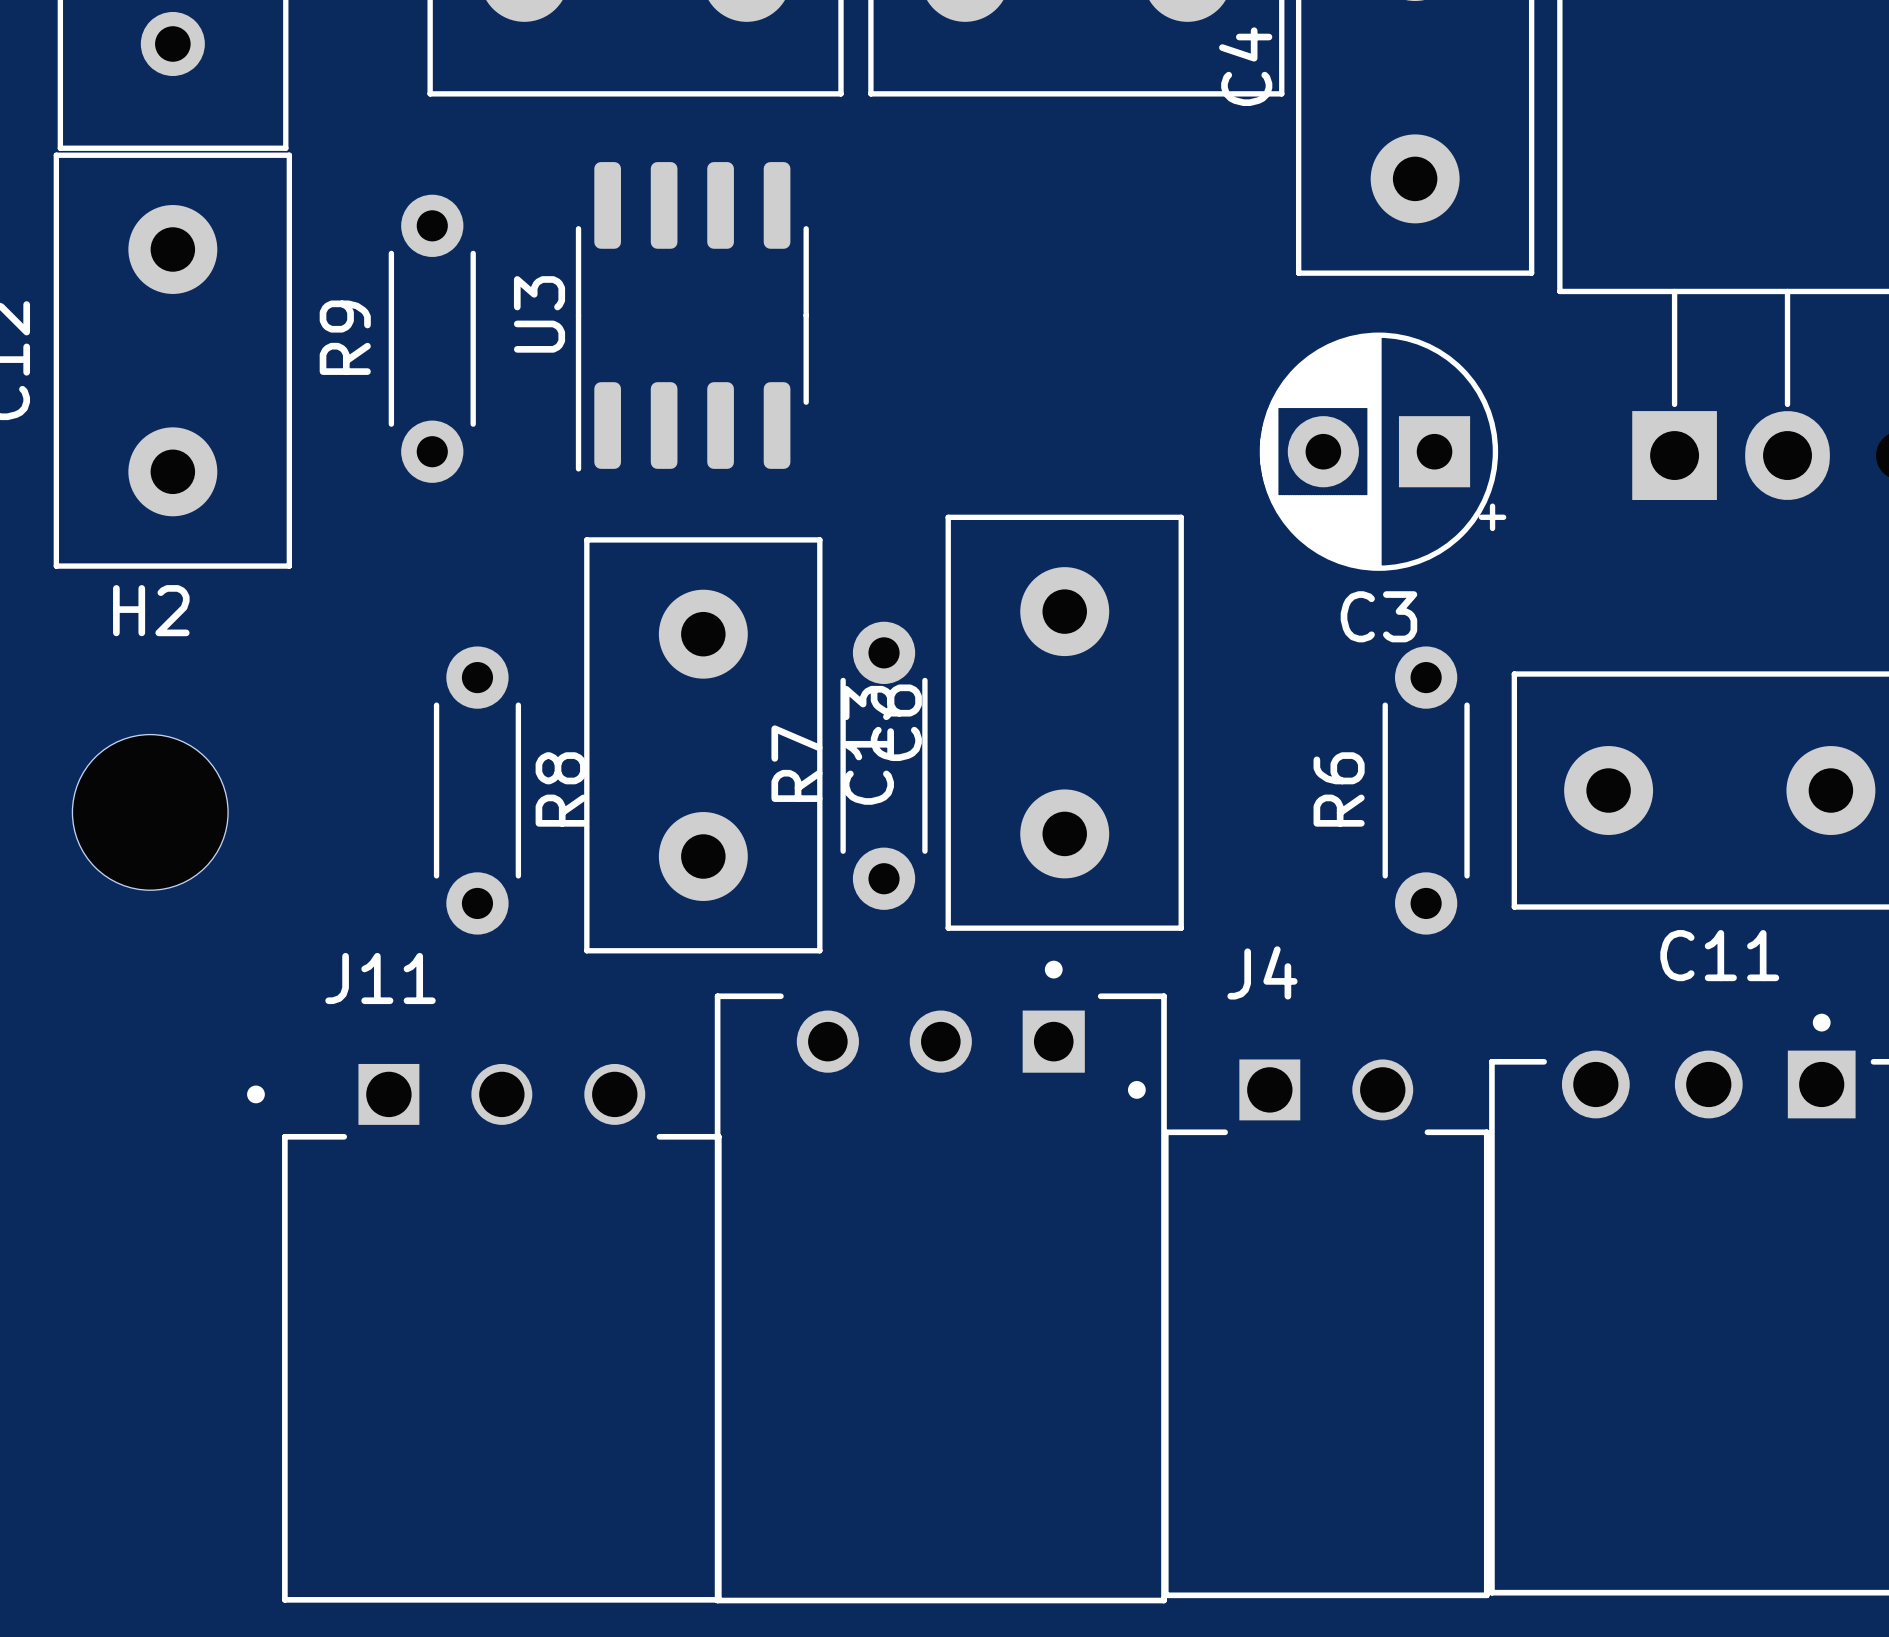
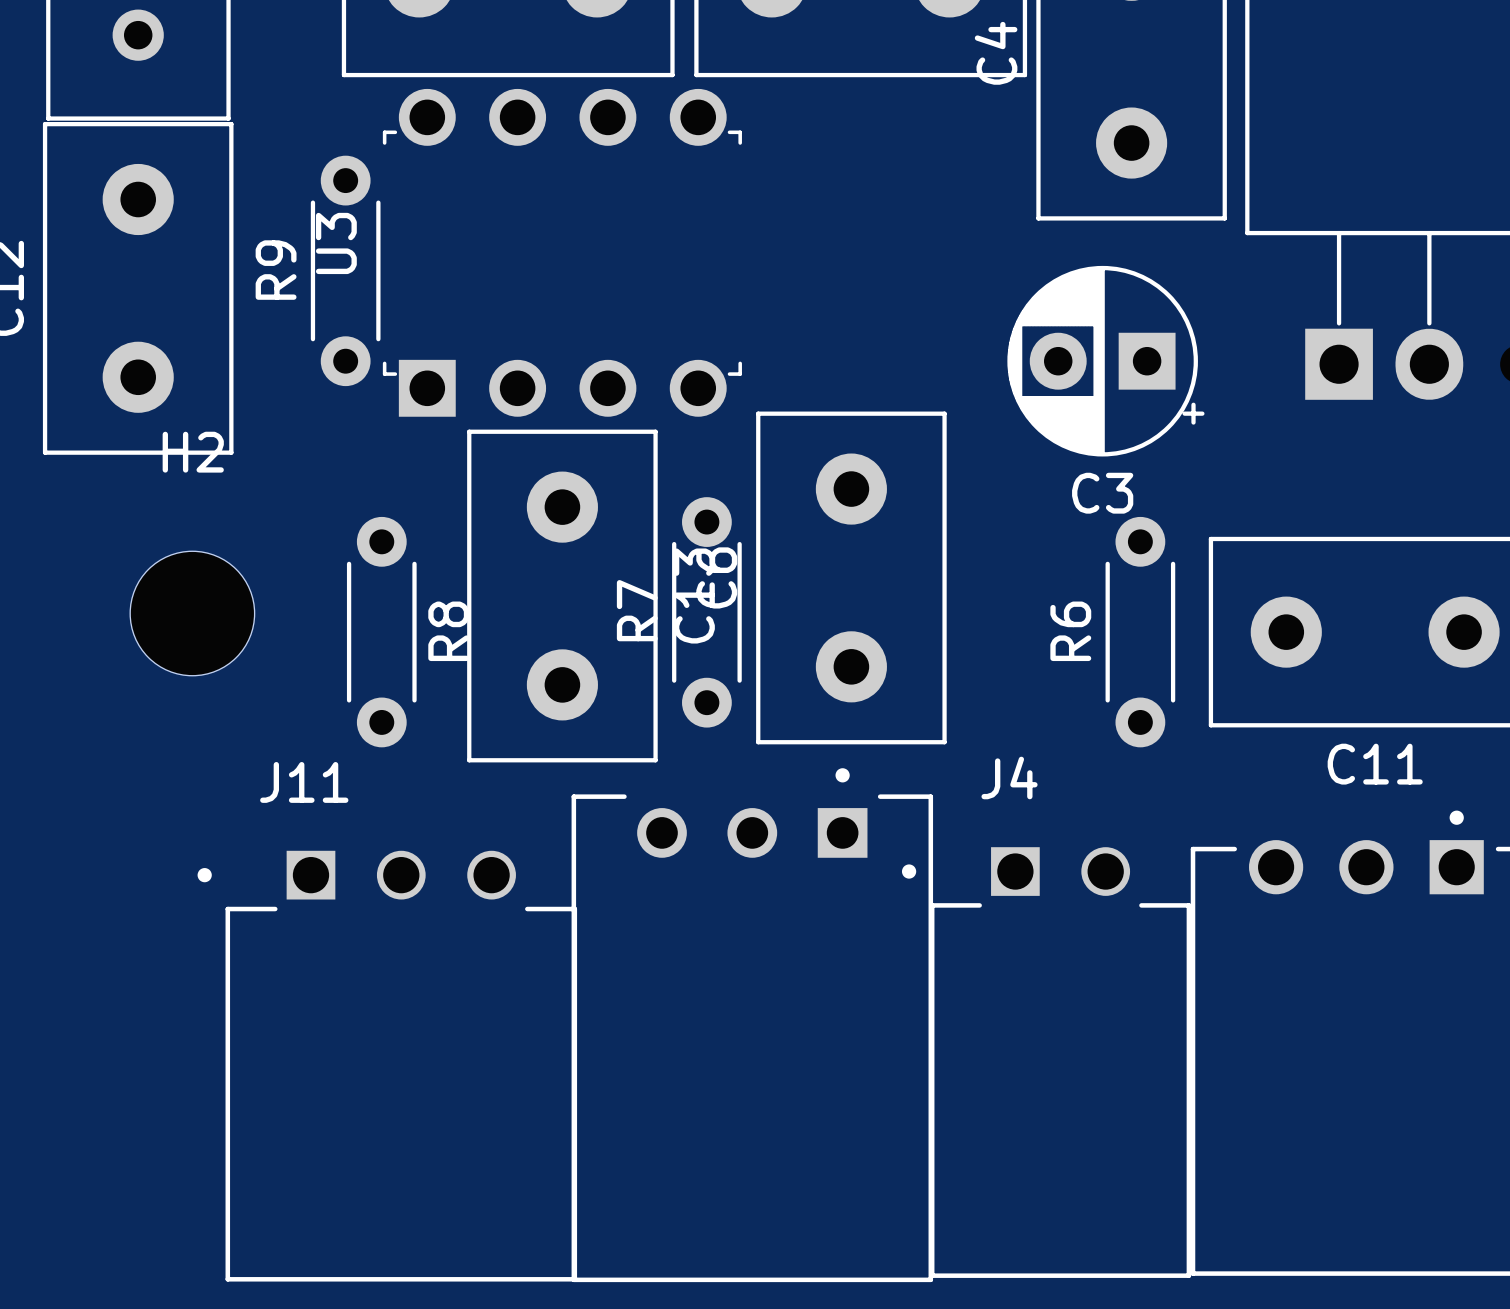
U3 footprint: [575, 162, 809, 472] -> [382, 88, 742, 417]
U3 name position: U3 (539, 314) -> U3 (336, 243)
H2 position: (150, 812) -> (192, 613)

